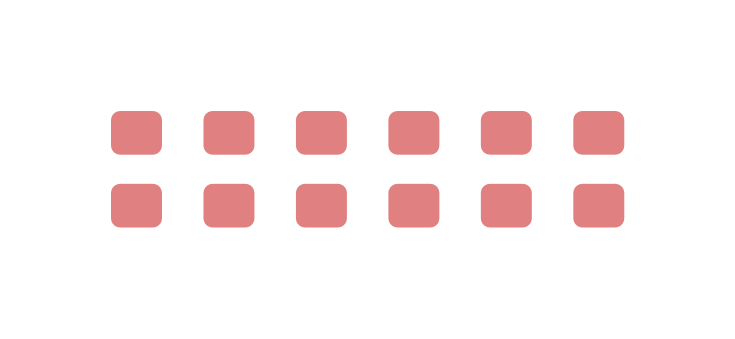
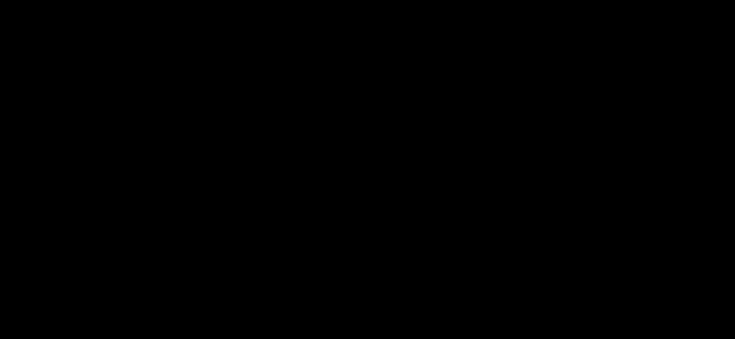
part: (136, 169) -> none
part: (228, 169) -> none
part: (321, 169) -> none
part: (413, 169) -> none
part: (506, 169) -> none
part: (598, 169) -> none

